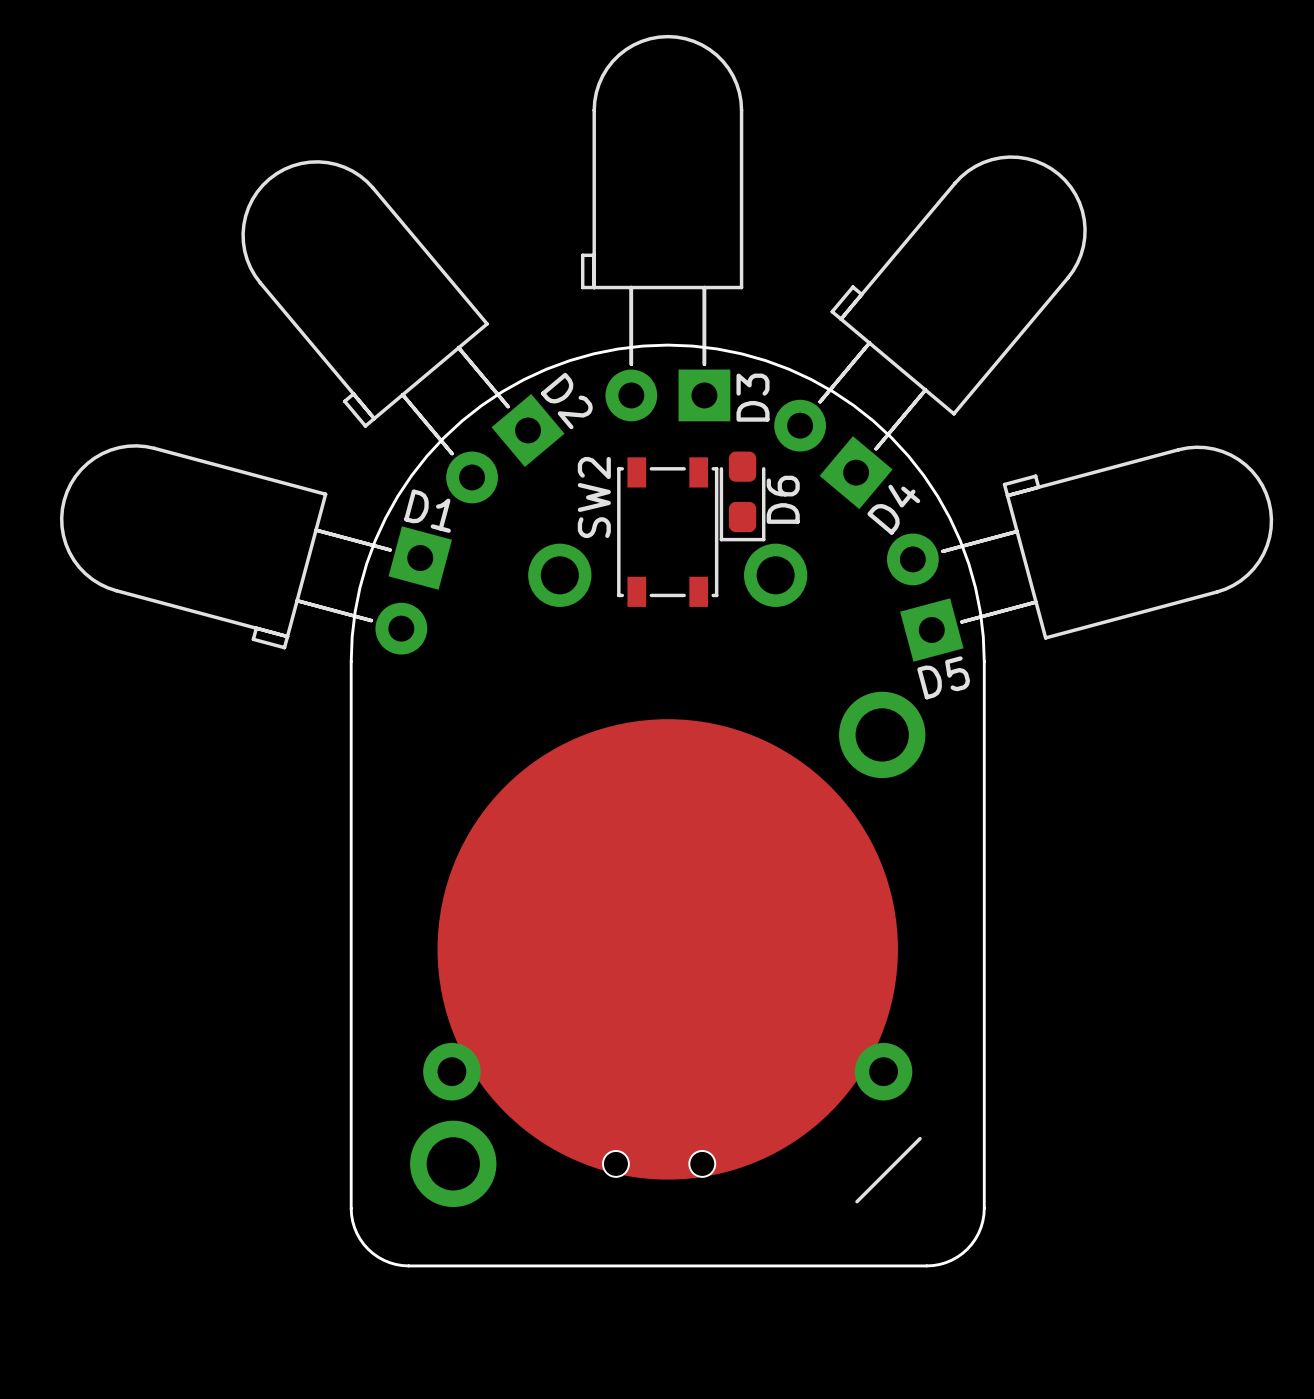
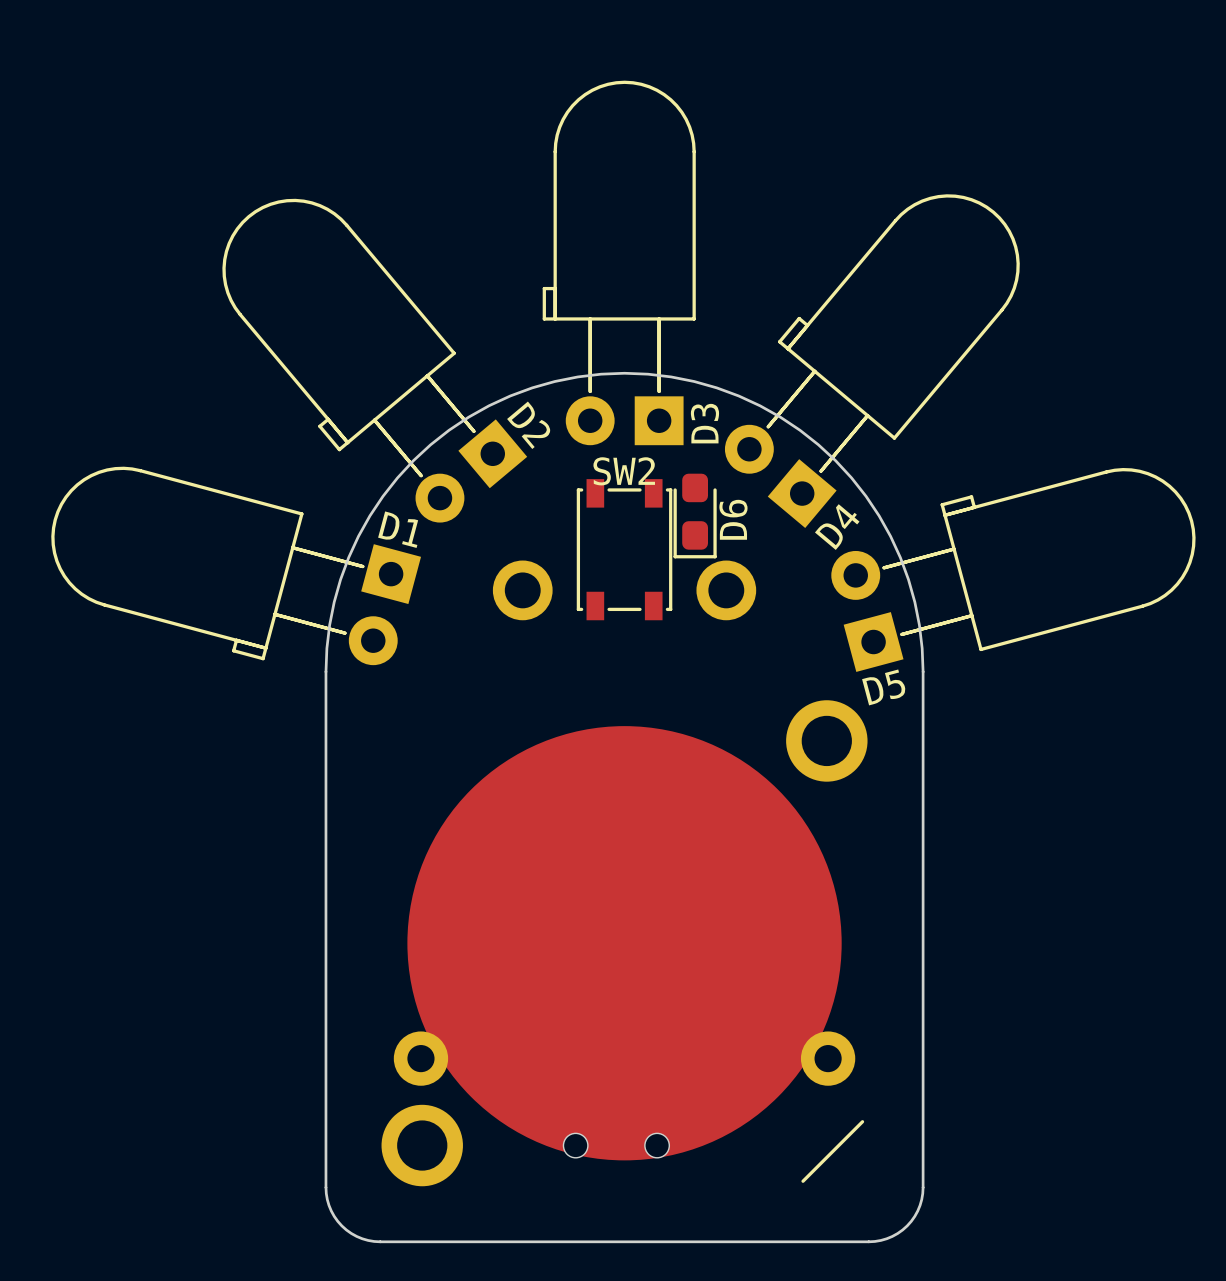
SW2 name rotation: 0° (594, 497) -> 90° clockwise (624, 471)

